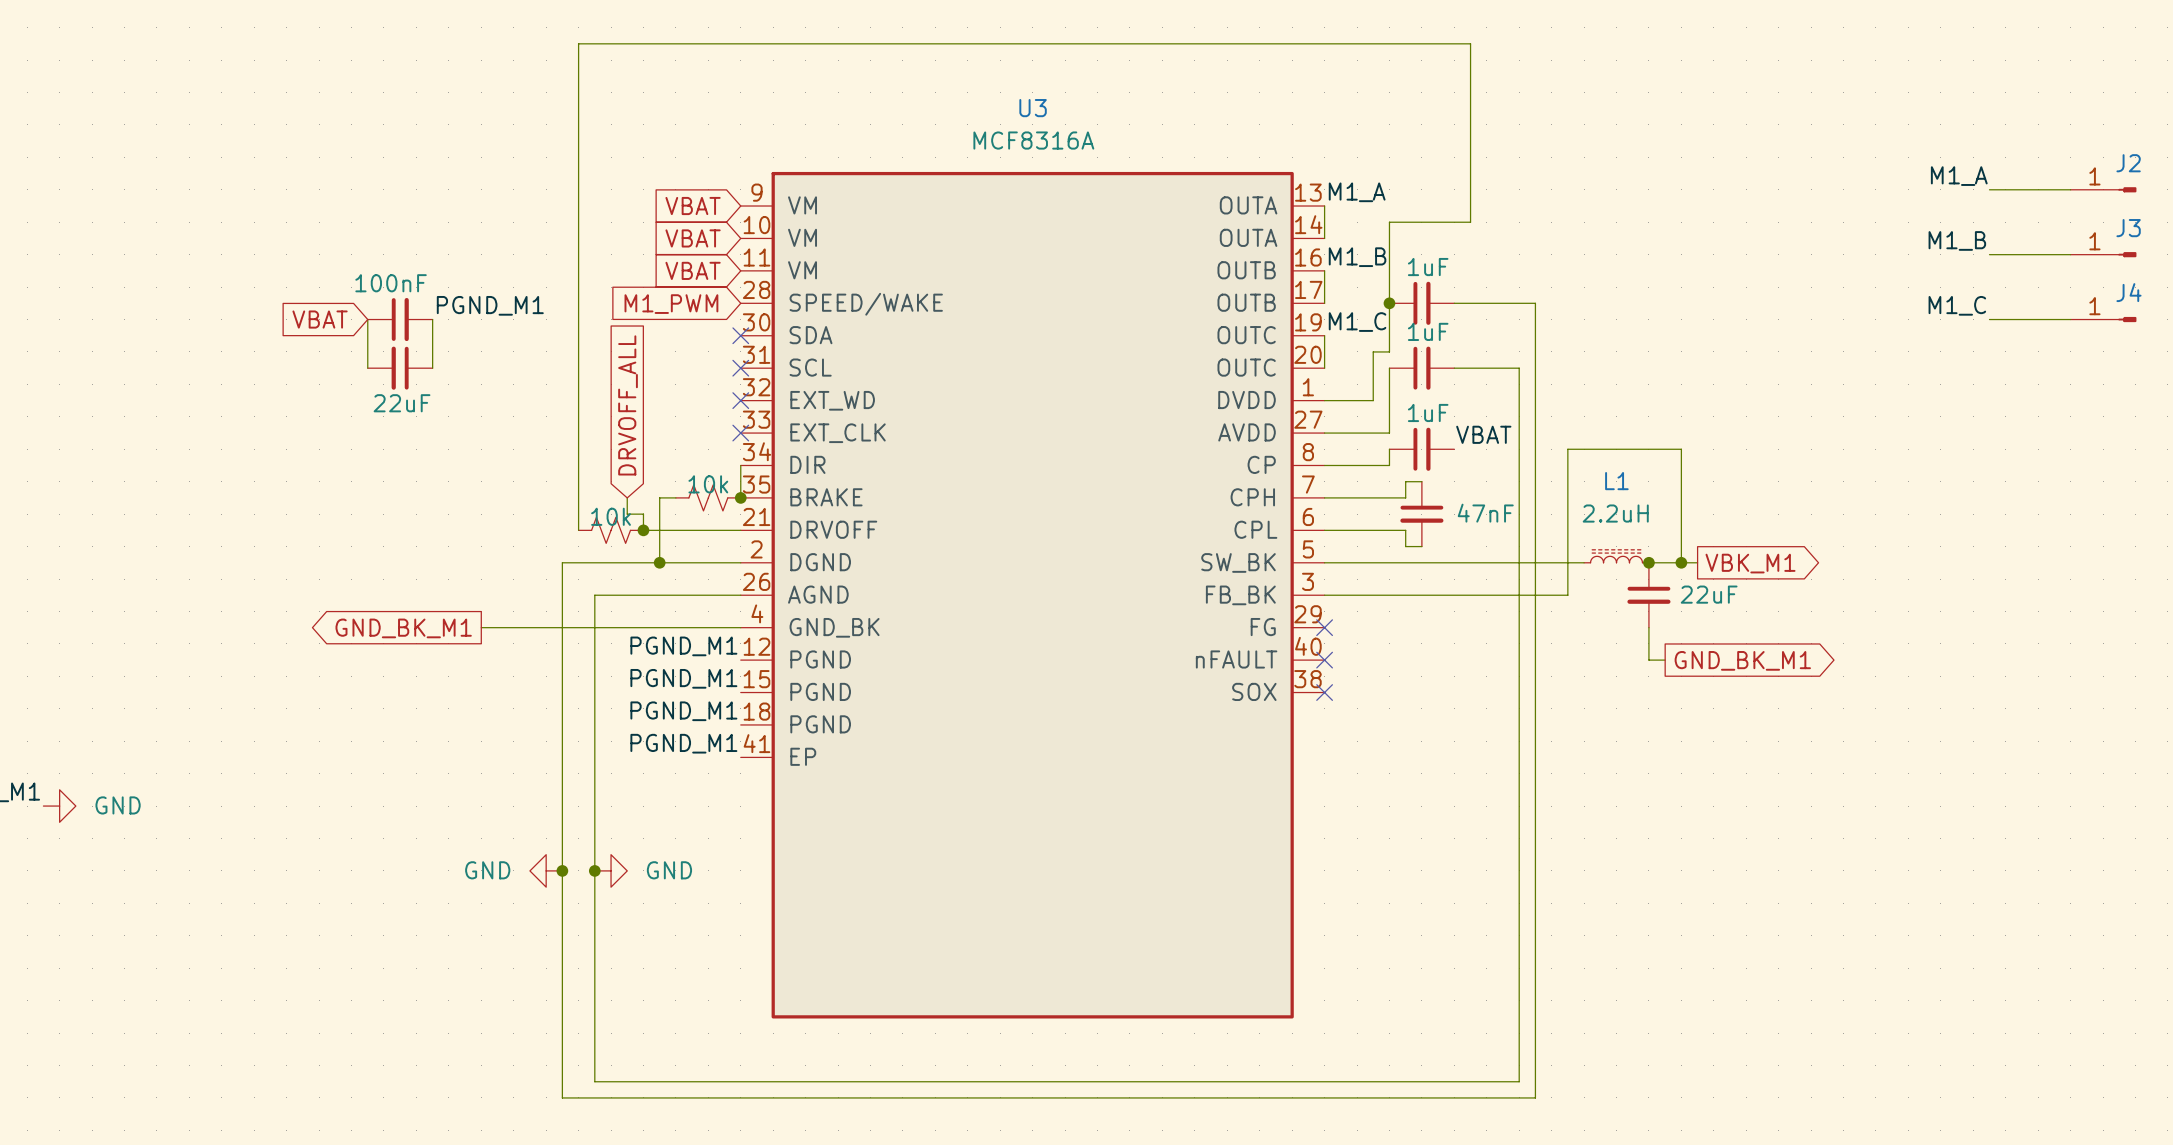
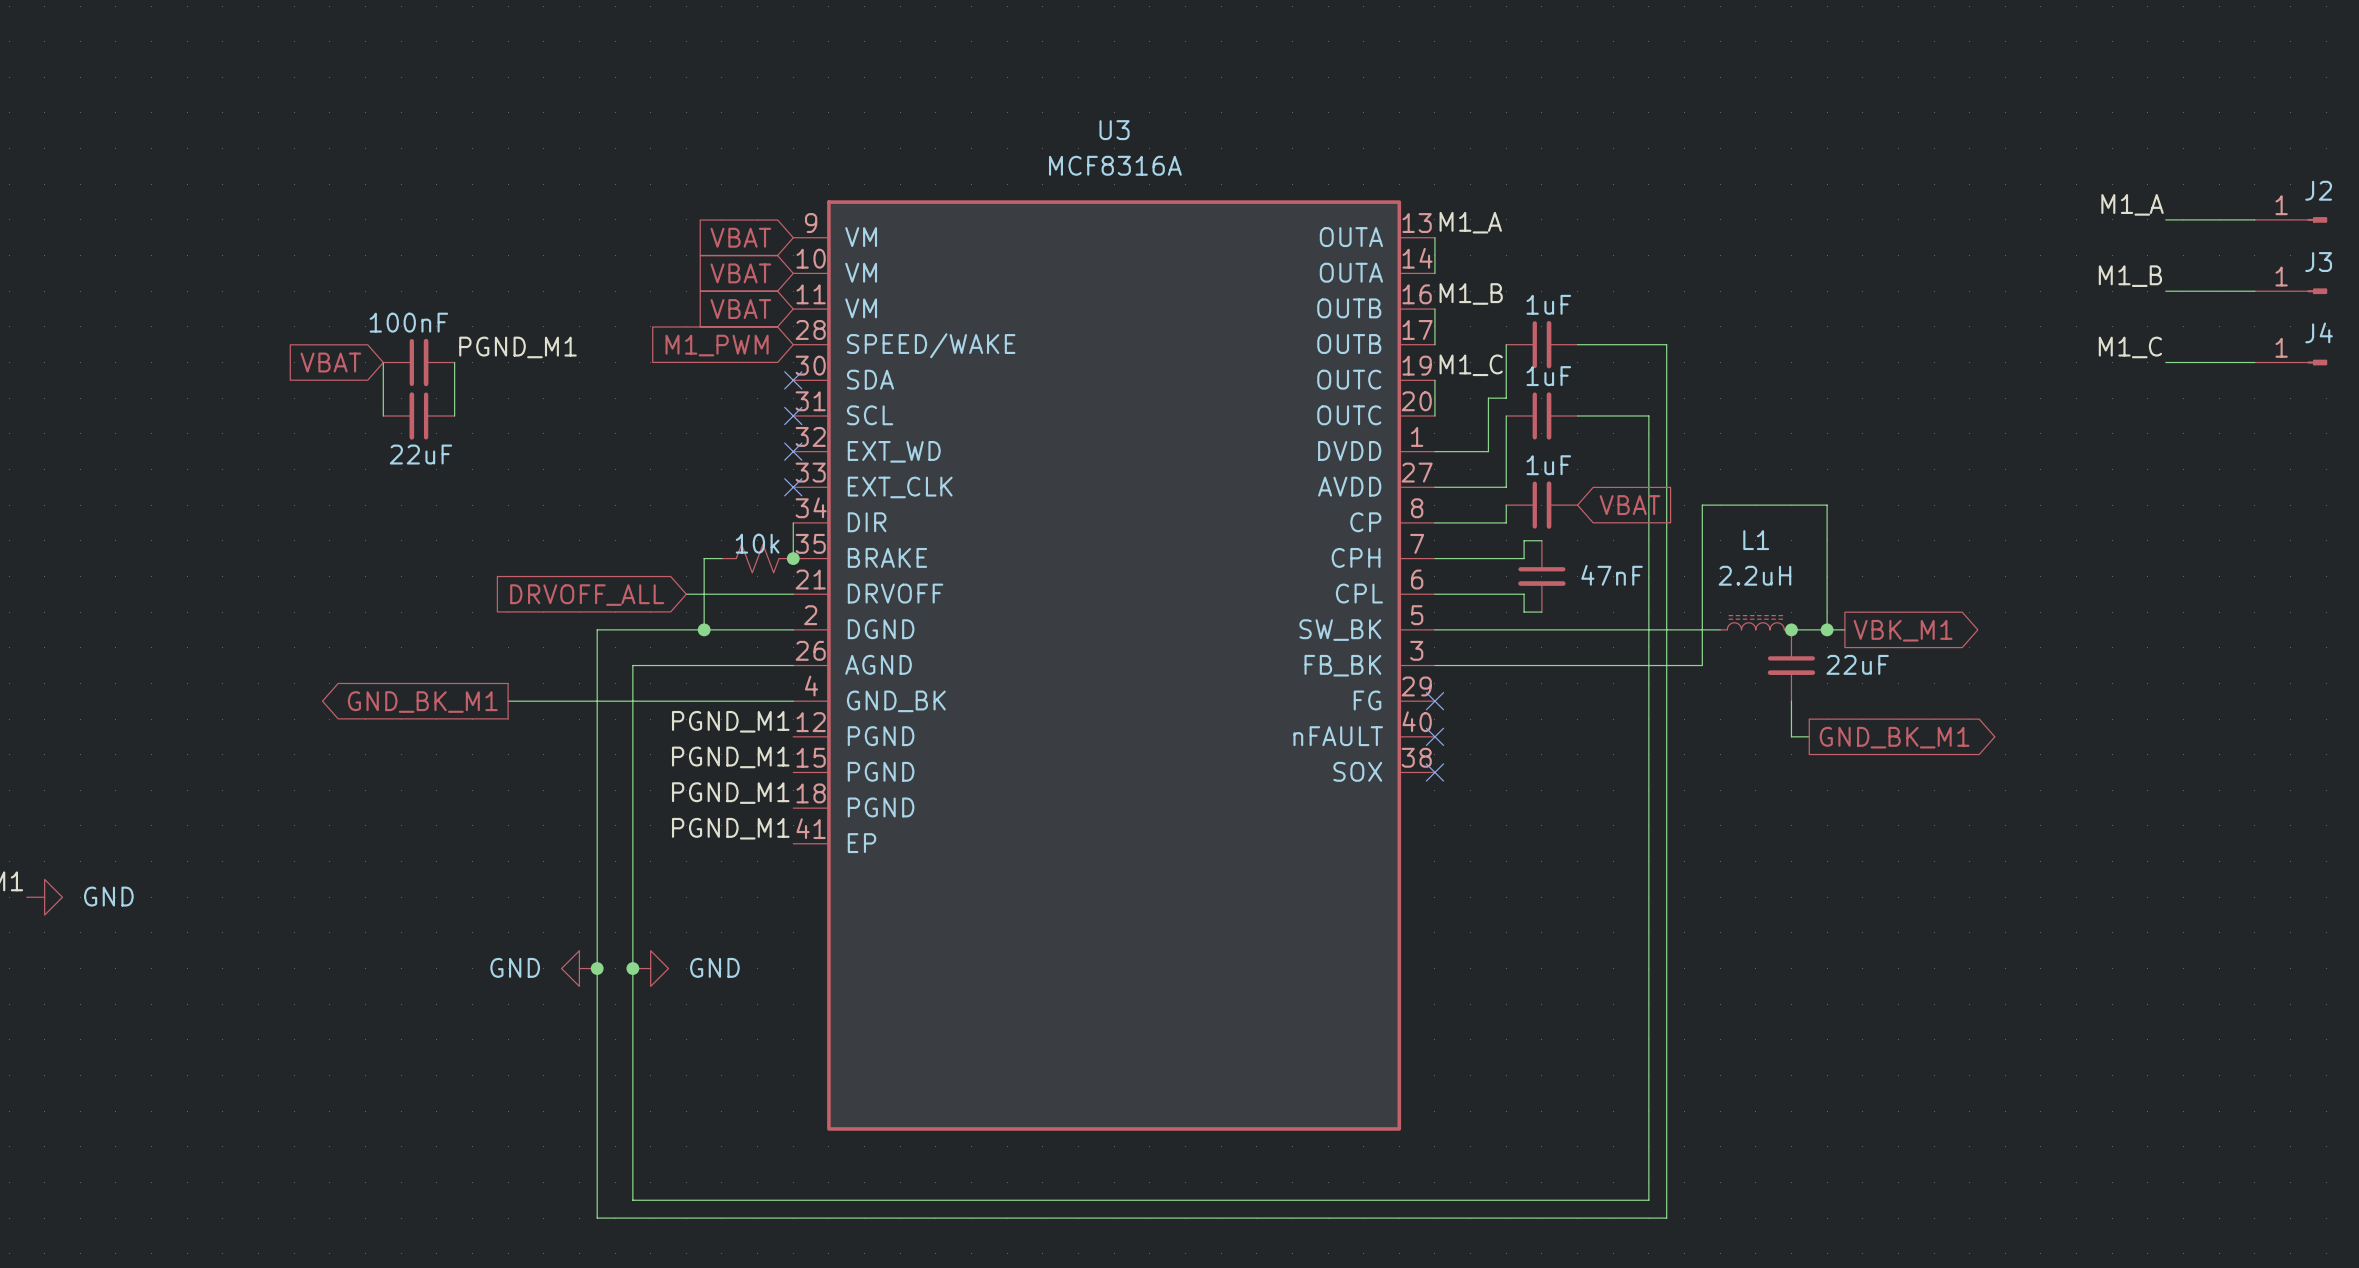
wire: (1389, 303) (1389, 222) (1470, 222) (1470, 43) (578, 43) (578, 530) -> none
junction: (1389, 303) -> none
global label rotation: 0° (628, 405) -> 90° counterclockwise (587, 595)
label: VBAT (1483, 434) -> none
global label: none -> VBAT (1629, 505)
wire: (627, 497) (627, 514) (643, 514) (643, 530) -> none
part: 10k (611, 530) -> none
junction: (643, 530) -> none

